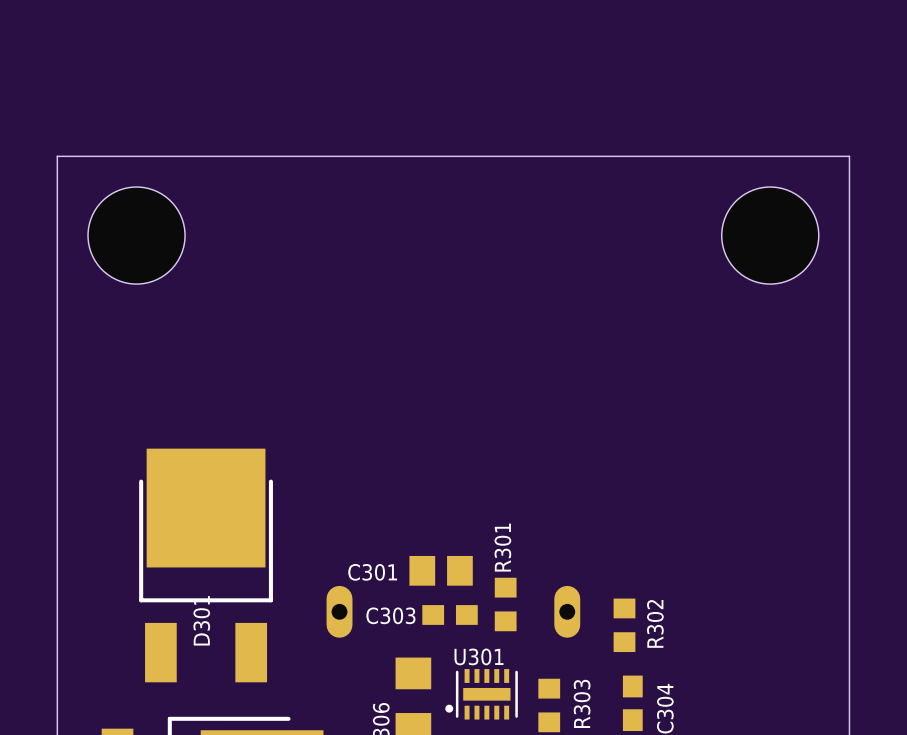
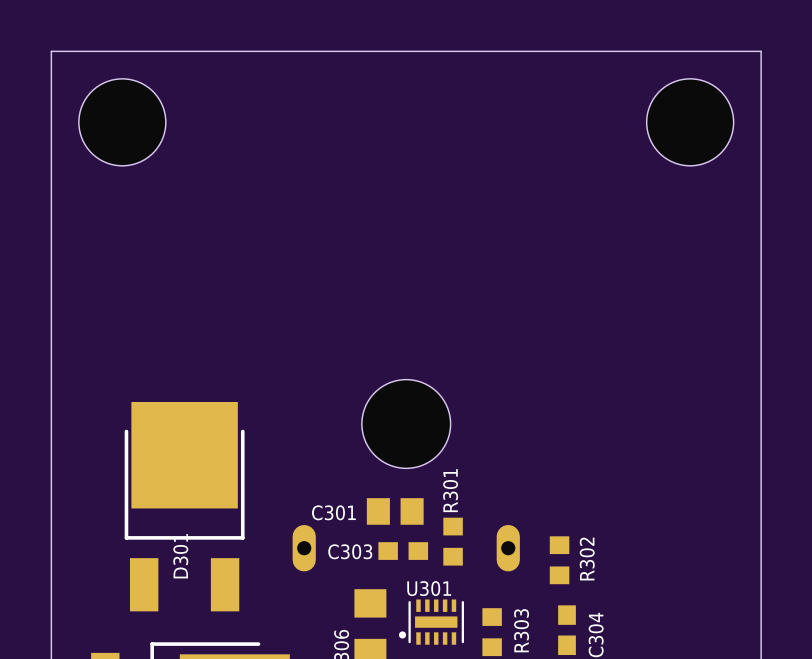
board edge: (849, 156) (57, 156) -> (761, 140) (761, 51) (51, 51) (51, 140)
hole position: (136, 235) -> (122, 122)
hole position: (770, 235) -> (690, 122)
hole: none -> (406, 423)

